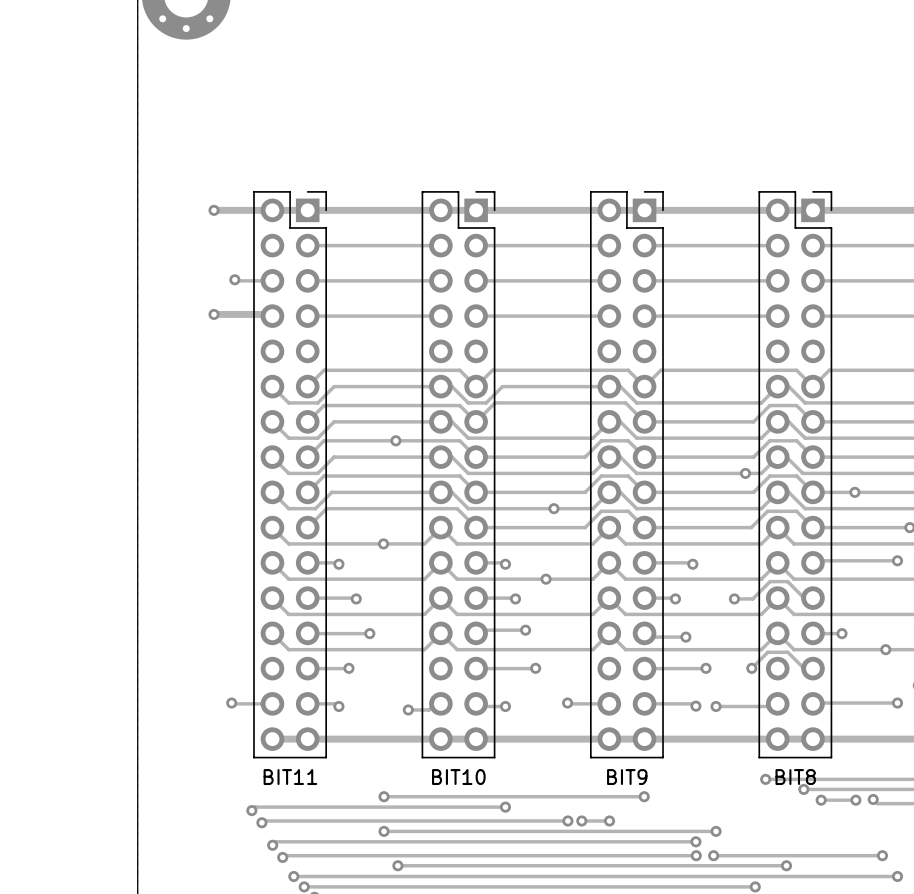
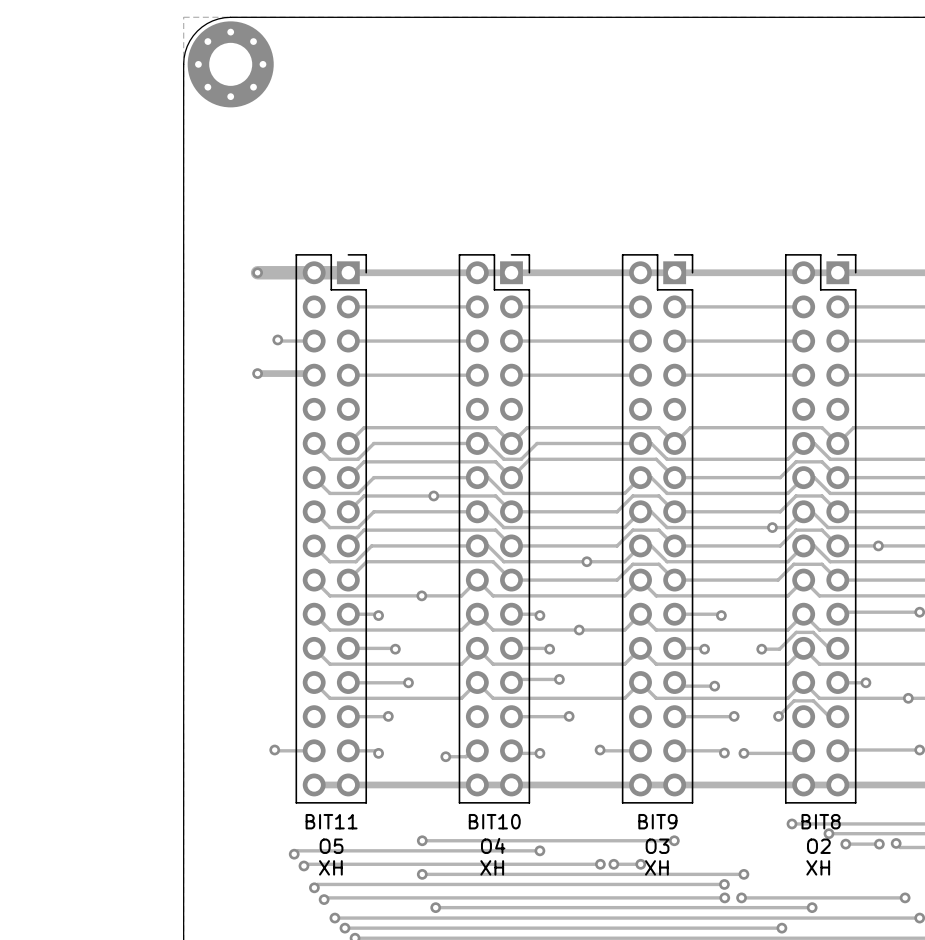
track width: thin (214, 210) (307, 210) -> thick (257, 272) (348, 272)
text: none -> O5 (331, 846)
text: none -> O4 (493, 845)
text: none -> O3 (657, 846)
text: none -> O2 (818, 846)
text: none -> XH (330, 867)
text: none -> XH (492, 867)
text: none -> XH (656, 867)
text: none -> XH (818, 867)

